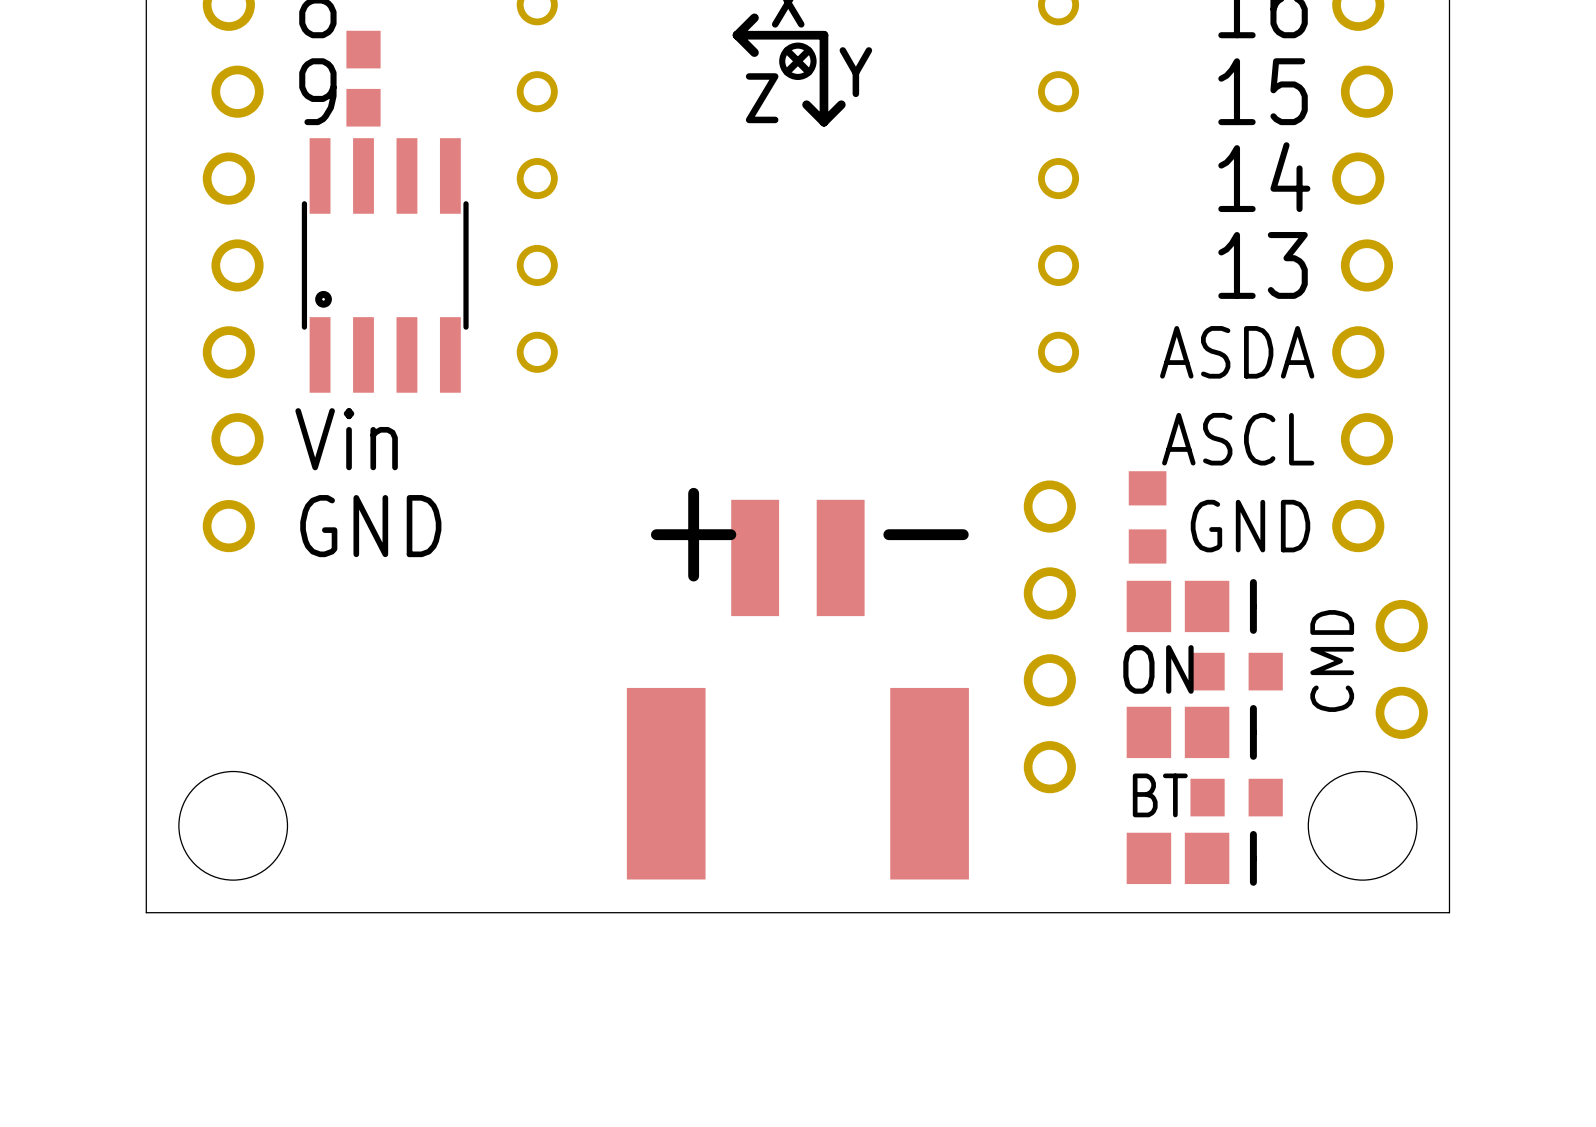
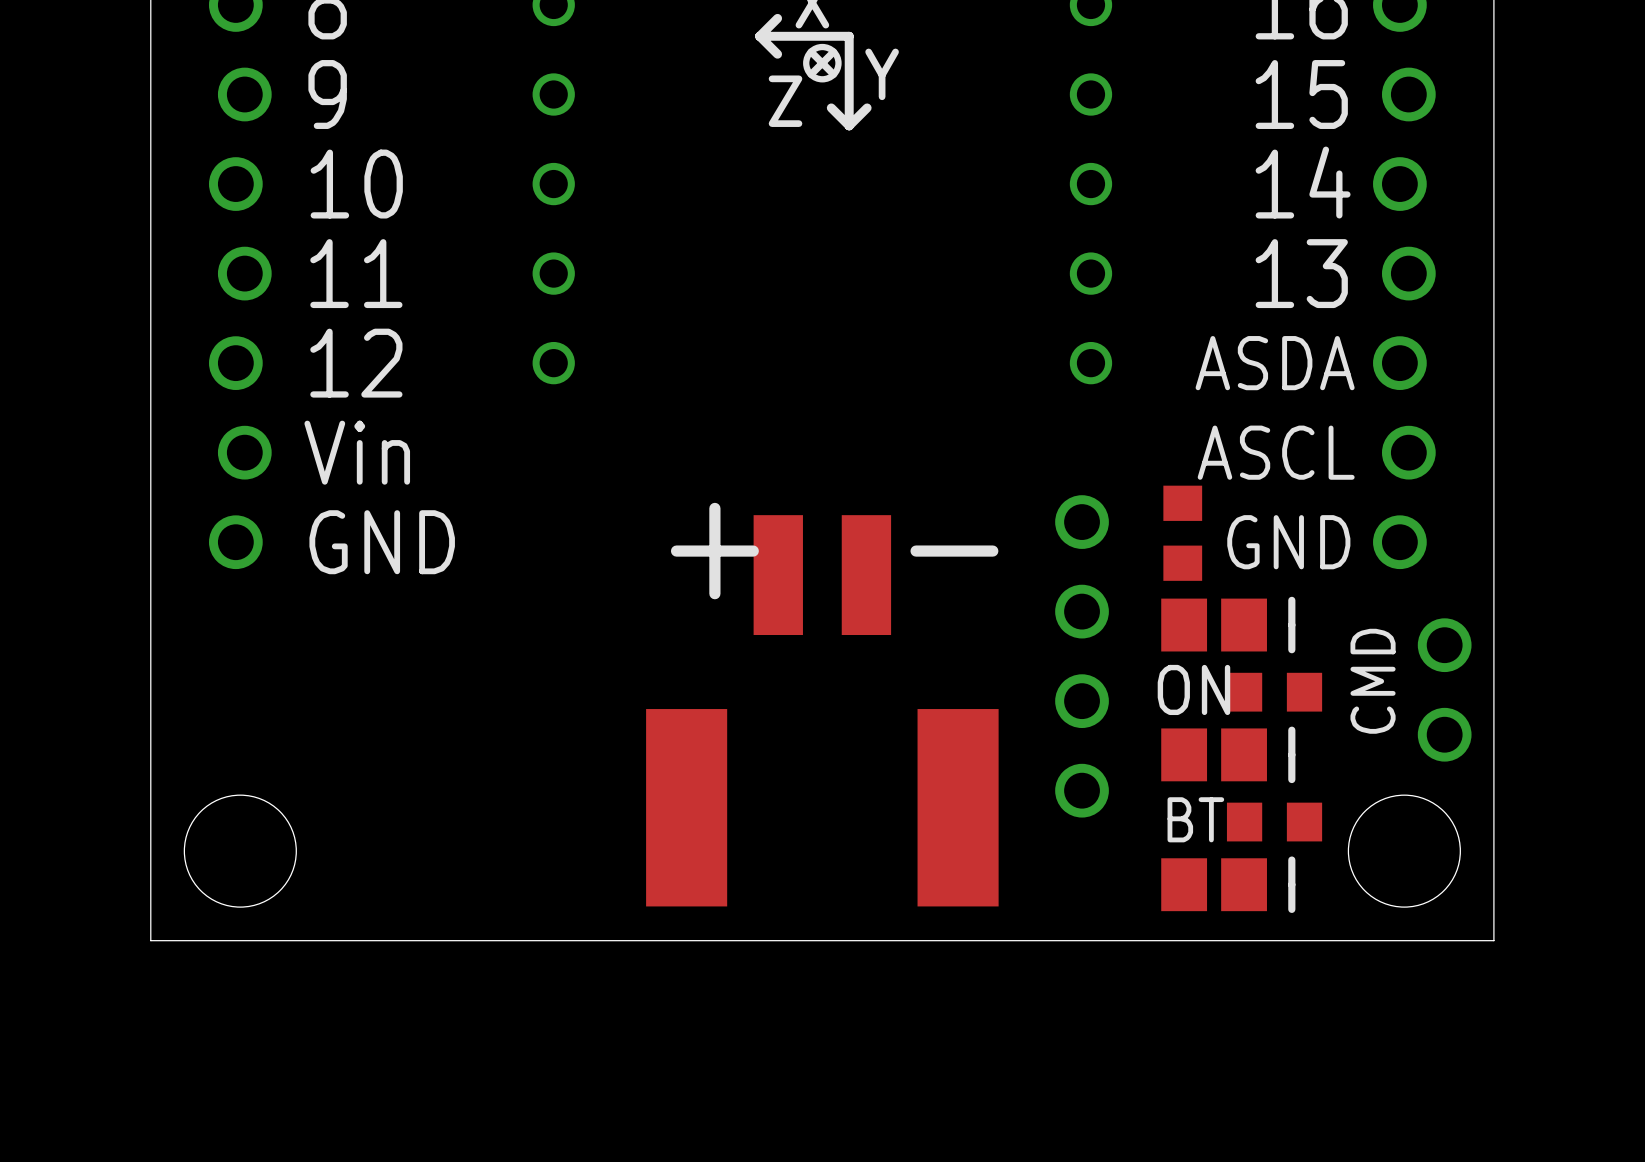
part: (363, 78) -> none
text: none -> 10 (356, 184)
text: none -> 11 (356, 273)
part: (385, 265) -> none
text: none -> 12 (356, 363)

